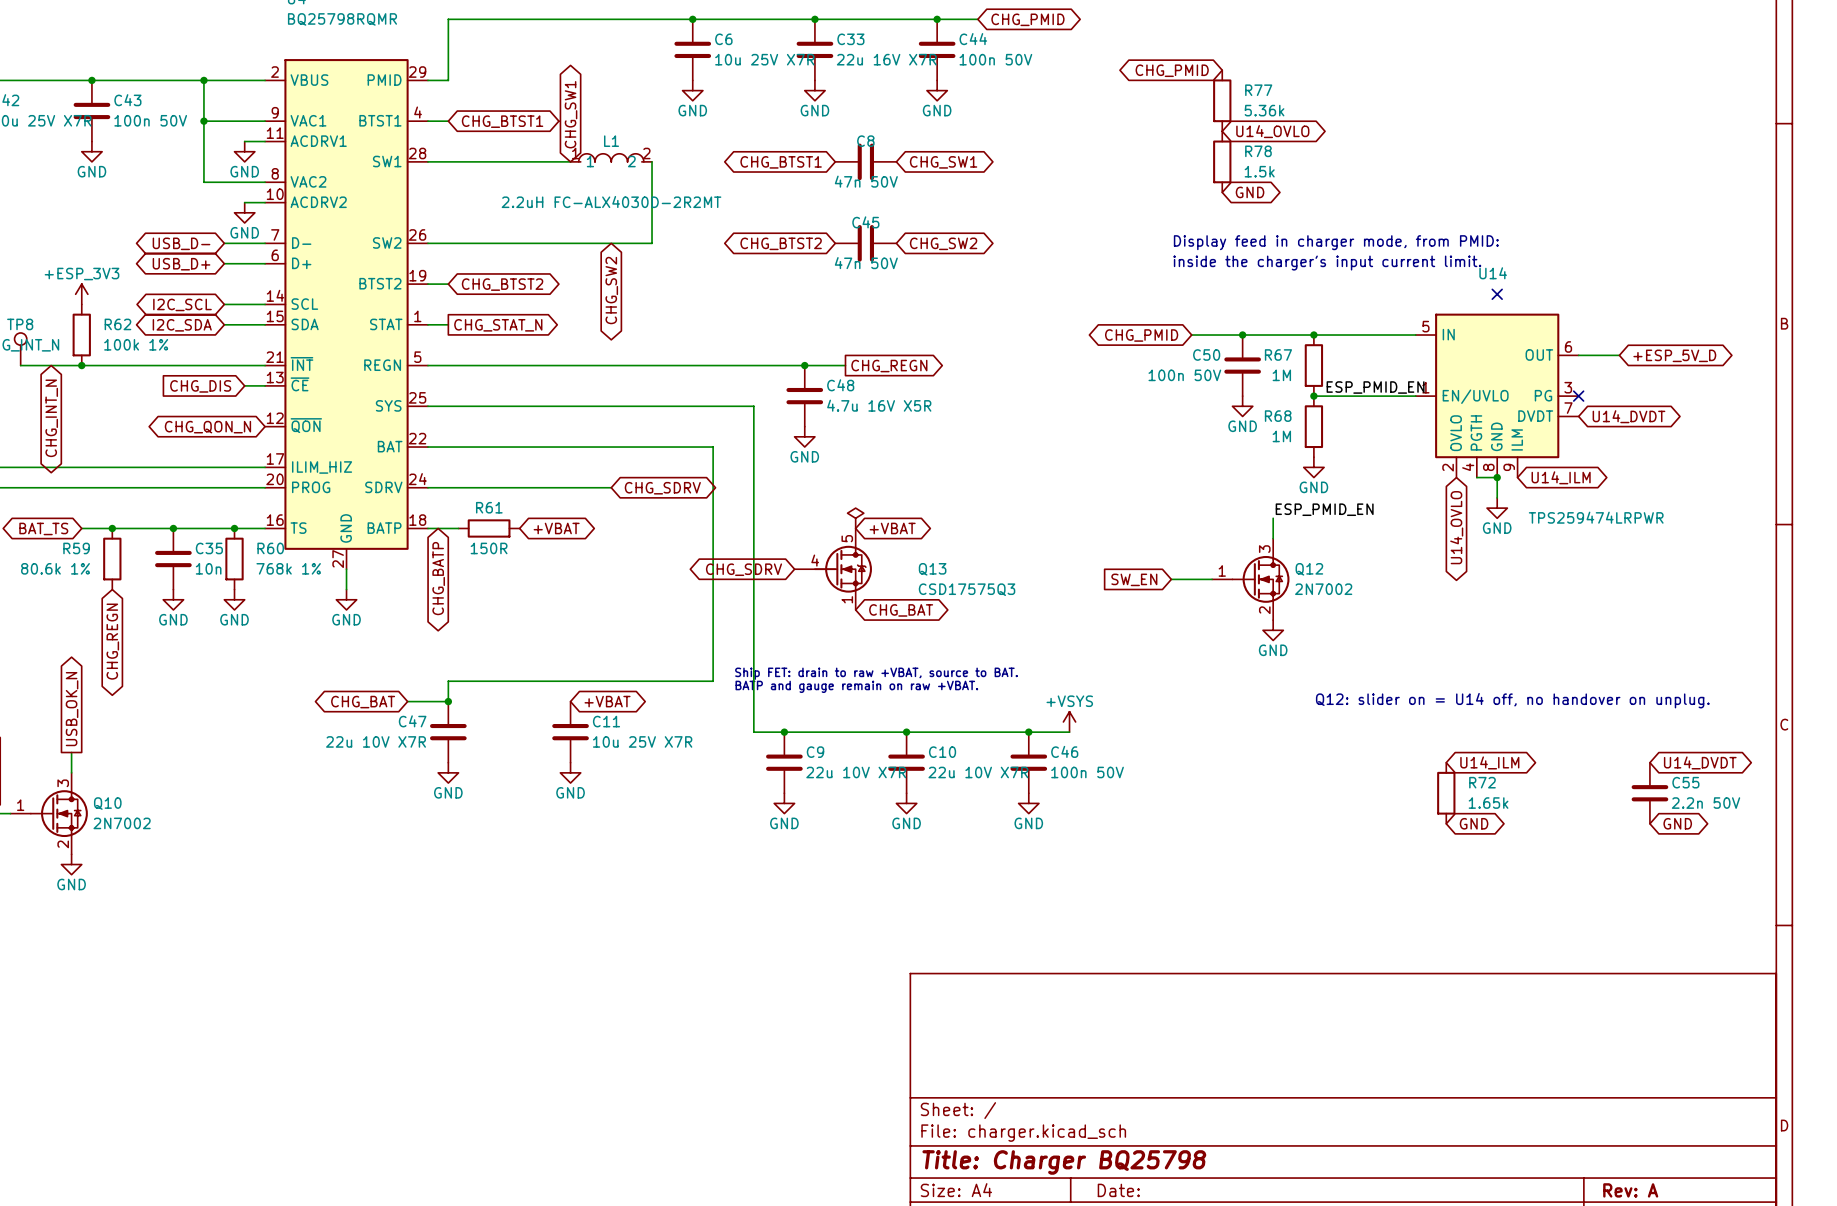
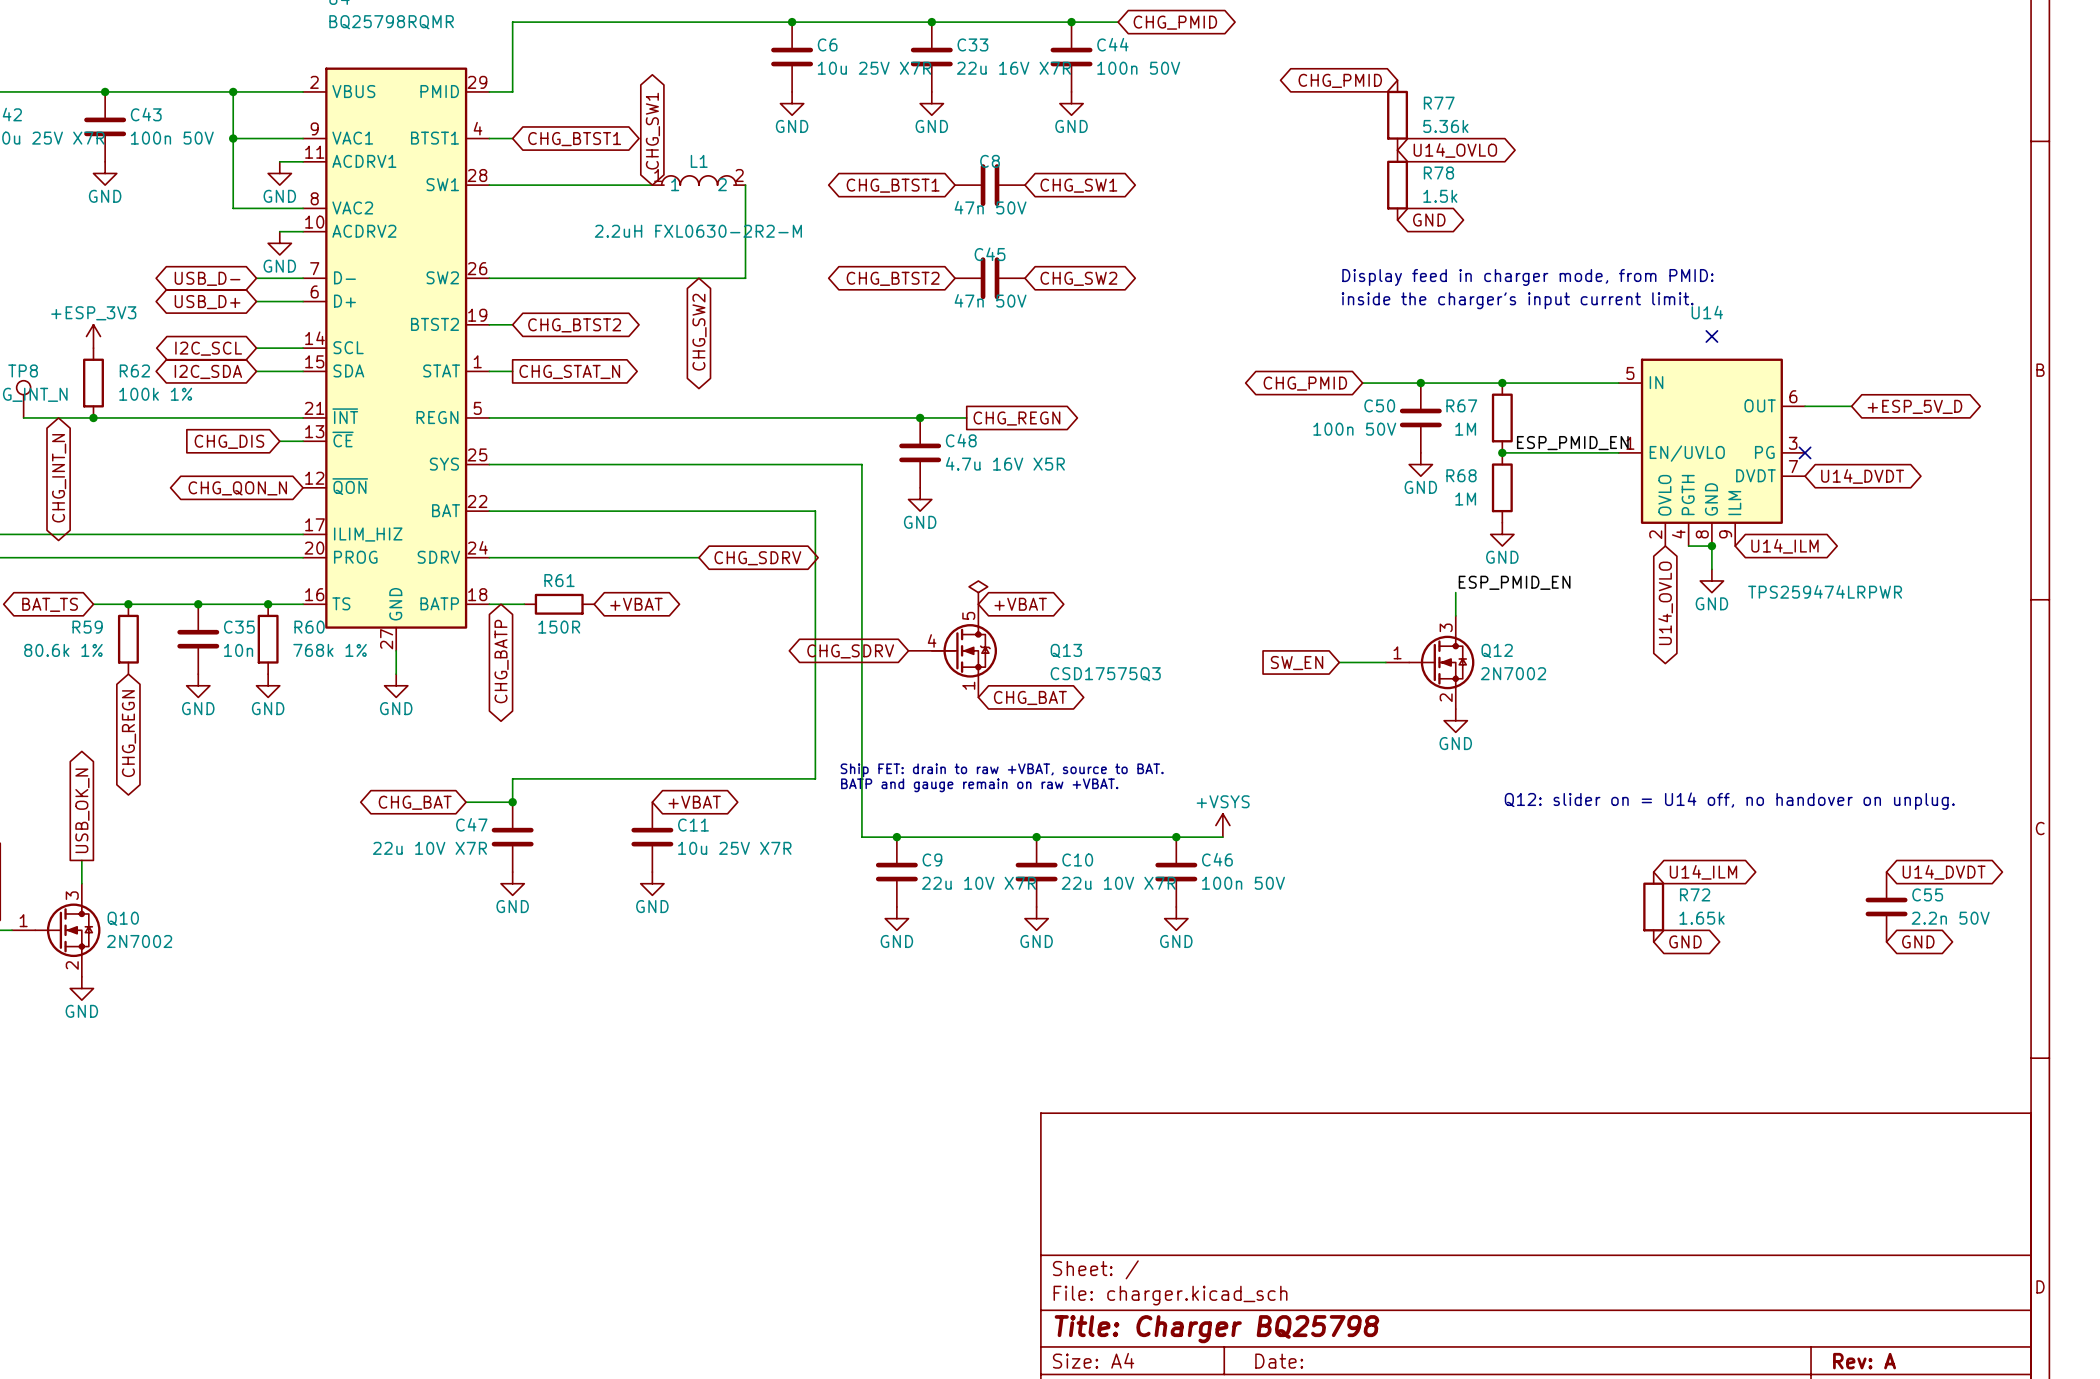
L1 value: 2.2uH FC-ALX4030D-2R2MT (611, 202) -> 2.2uH FXL0630-2R2-M (698, 231)

